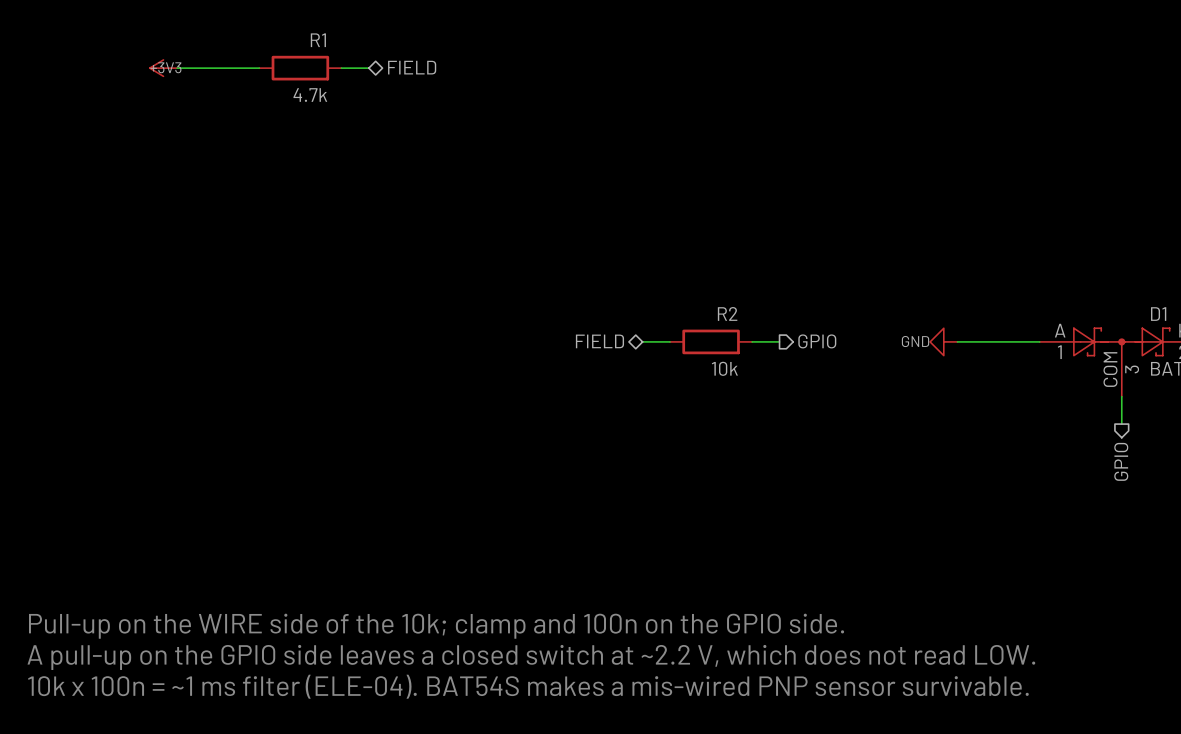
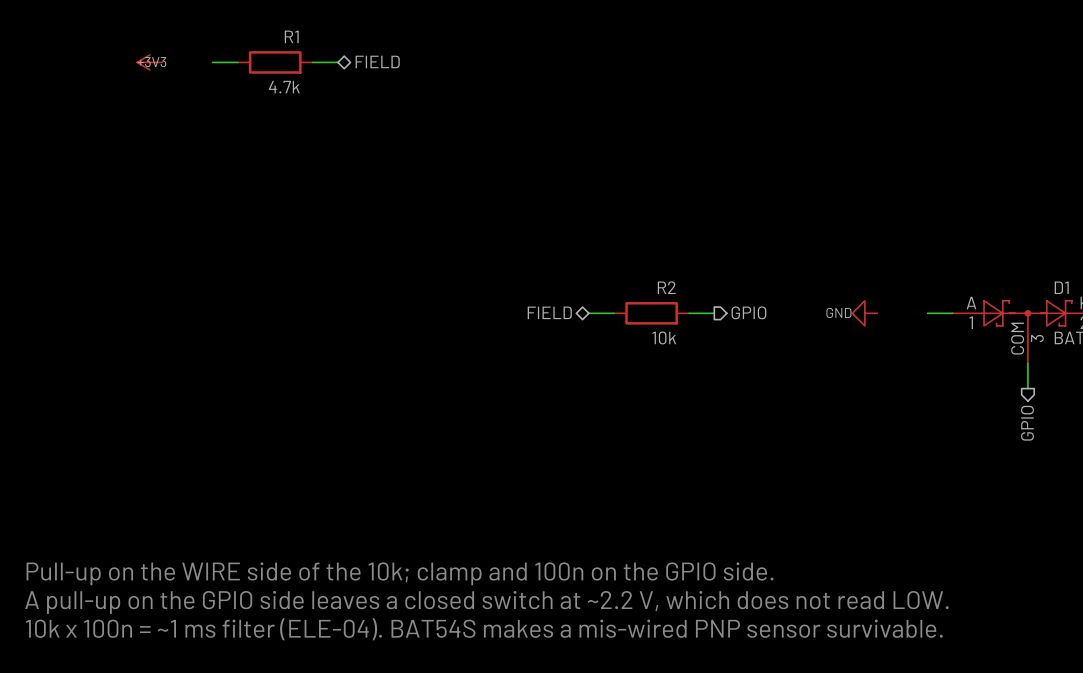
wire: (177, 68) (231, 68) -> none
wire: (957, 341) (1012, 341) -> none

